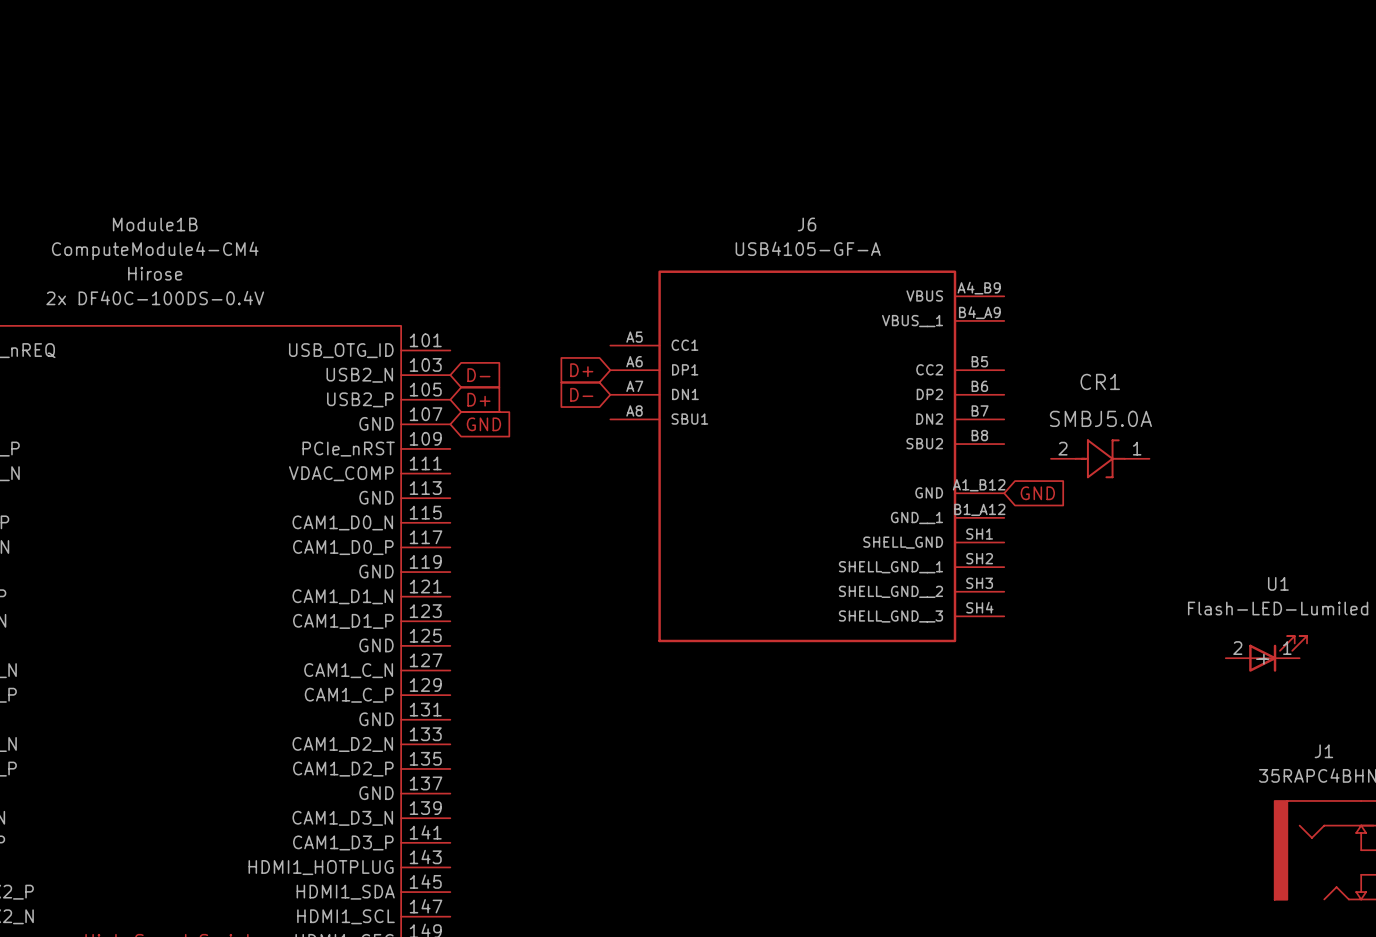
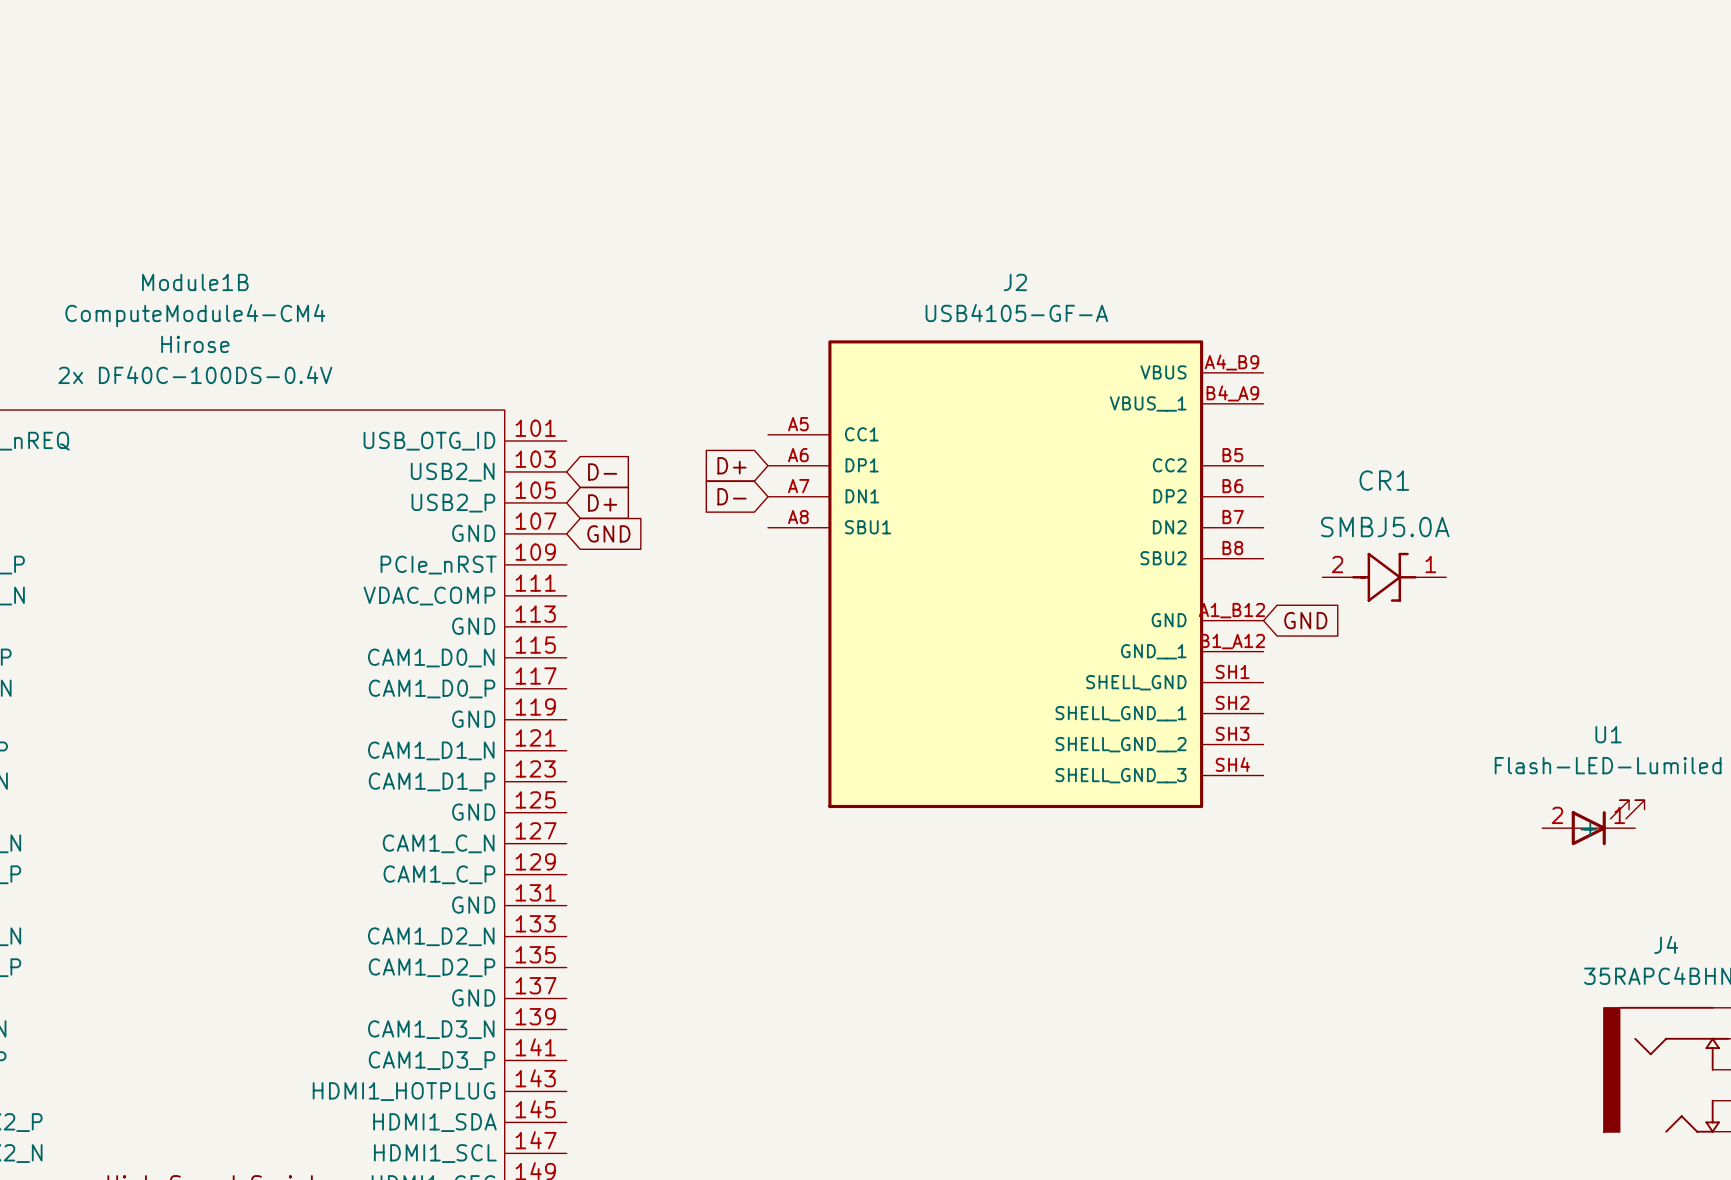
J6 name: J6 (807, 224) -> J2 (1015, 282)
J1 name: J1 (1323, 751) -> J4 (1666, 944)

